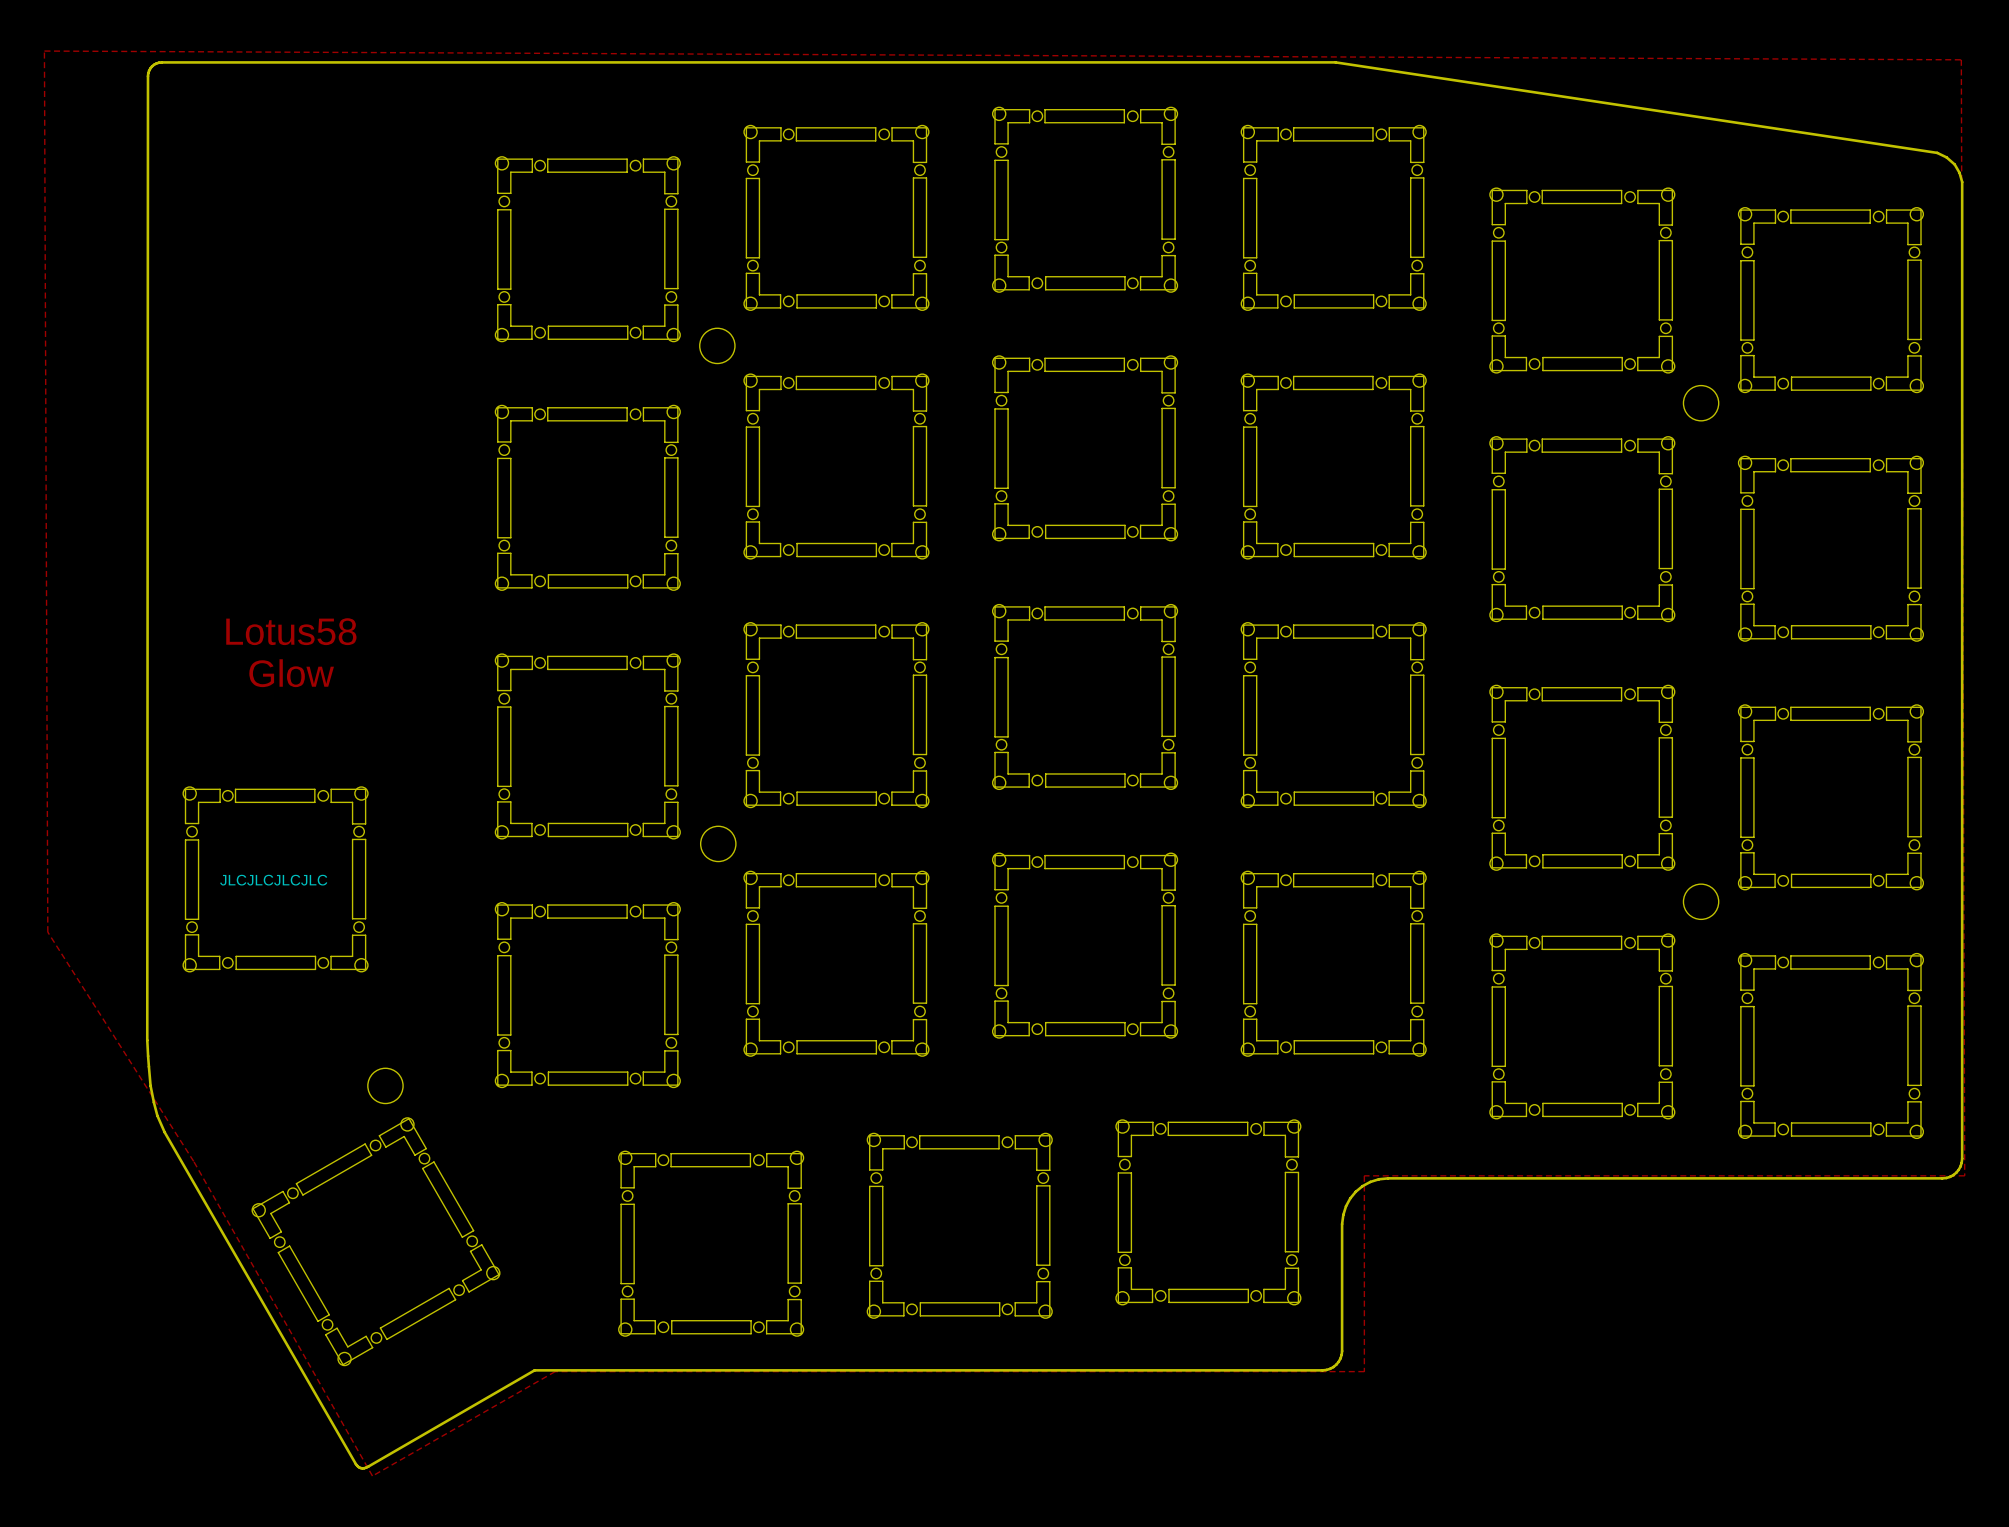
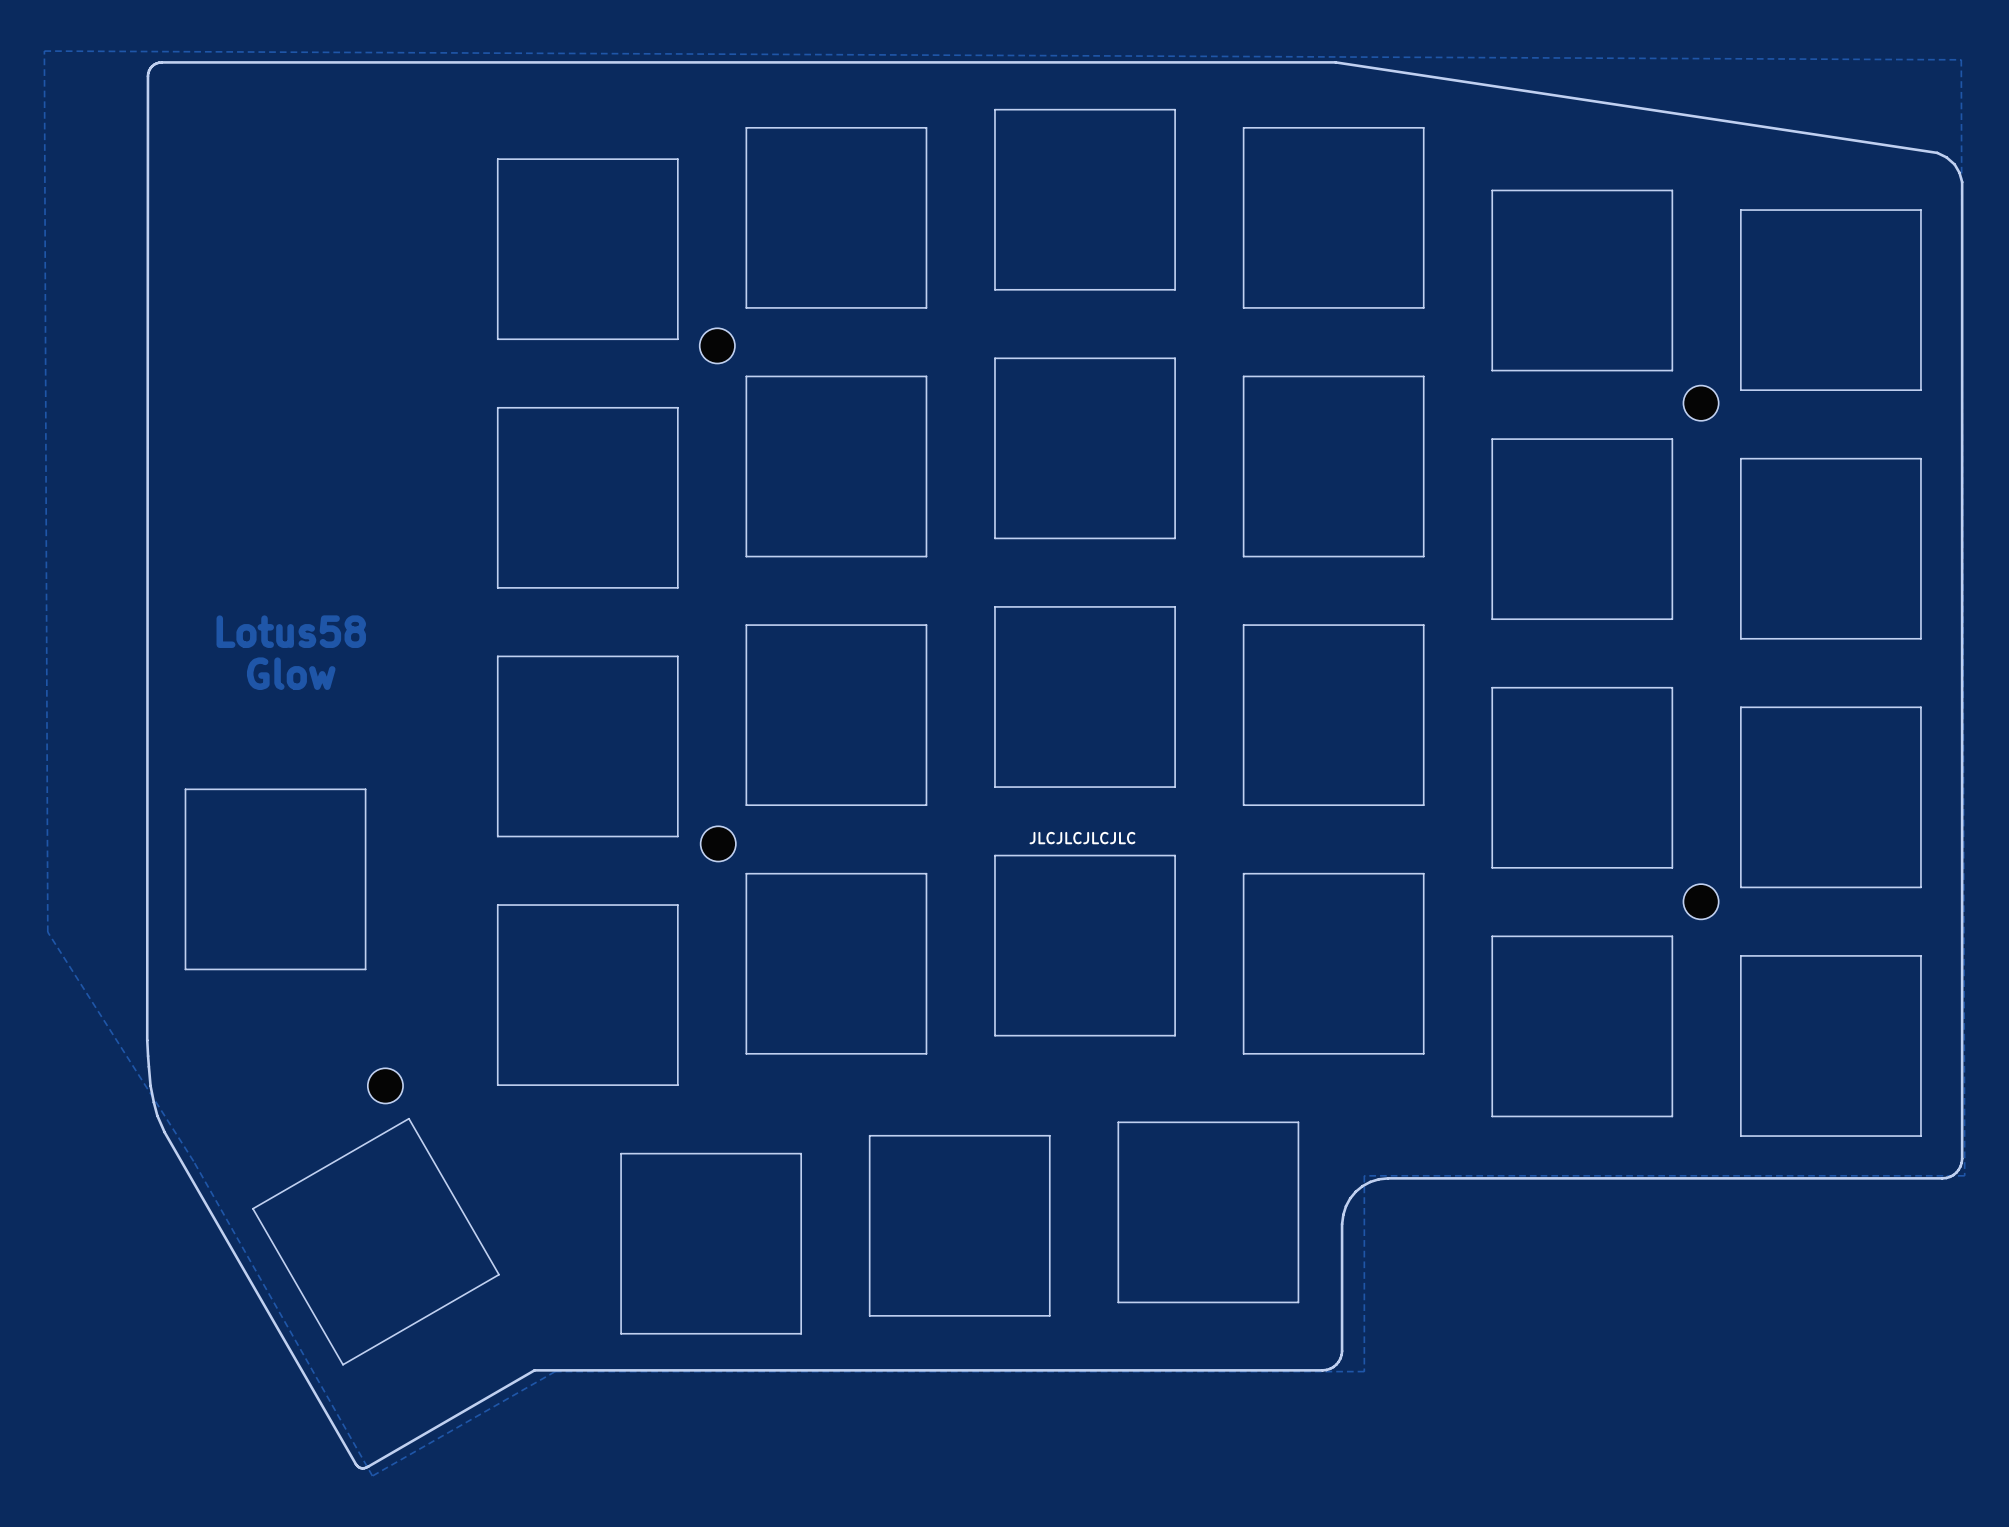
drawing: none -> [994, 109, 1176, 291]
drawing: none -> [745, 127, 928, 309]
drawing: none -> [1242, 127, 1425, 309]
drawing: none -> [497, 158, 679, 340]
drawing: none -> [1491, 189, 1674, 372]
part: (1085, 199) -> none
drawing: none -> [1740, 209, 1922, 391]
part: (836, 217) -> none
part: (1333, 217) -> none
part: (587, 249) -> none
part: (1582, 280) -> none
part: (1830, 300) -> none
drawing: none -> [994, 357, 1176, 540]
drawing: none -> [745, 375, 928, 558]
drawing: none -> [1242, 375, 1425, 558]
drawing: none -> [497, 407, 679, 589]
drawing: none -> [1491, 438, 1674, 620]
part: (1085, 448) -> none
drawing: none -> [1740, 458, 1922, 640]
part: (836, 466) -> none
part: (1333, 466) -> none
part: (587, 497) -> none
part: (1582, 529) -> none
part: (1830, 548) -> none
drawing: none -> [994, 606, 1176, 788]
drawing: none -> [745, 624, 928, 806]
drawing: none -> [1242, 624, 1425, 806]
drawing: none -> [497, 655, 679, 838]
drawing: none -> [1491, 687, 1674, 869]
part: (1085, 696) -> none
drawing: none -> [1740, 706, 1922, 889]
part: (836, 715) -> none
part: (1333, 715) -> none
part: (587, 746) -> none
part: (1582, 777) -> none
drawing: none -> [184, 788, 367, 971]
part: (1830, 797) -> none
text: none -> JLCJLCJLCJLC (1082, 838)
drawing: none -> [994, 854, 1176, 1037]
drawing: none -> [745, 873, 928, 1055]
drawing: none -> [1242, 873, 1425, 1055]
part: (275, 879) -> none
text: JLCJLCJLCJLC (273, 880) -> none
drawing: none -> [497, 904, 679, 1086]
drawing: none -> [1491, 935, 1674, 1118]
part: (1085, 945) -> none
drawing: none -> [1740, 955, 1922, 1137]
part: (836, 963) -> none
part: (1333, 963) -> none
part: (587, 995) -> none
part: (1582, 1026) -> none
part: (1830, 1045) -> none
drawing: none -> [252, 1118, 500, 1366]
drawing: none -> [1117, 1121, 1300, 1304]
drawing: none -> [869, 1135, 1051, 1317]
drawing: none -> [620, 1152, 802, 1335]
part: (1208, 1212) -> none
part: (959, 1225) -> none
part: (376, 1241) -> none
part: (711, 1243) -> none

